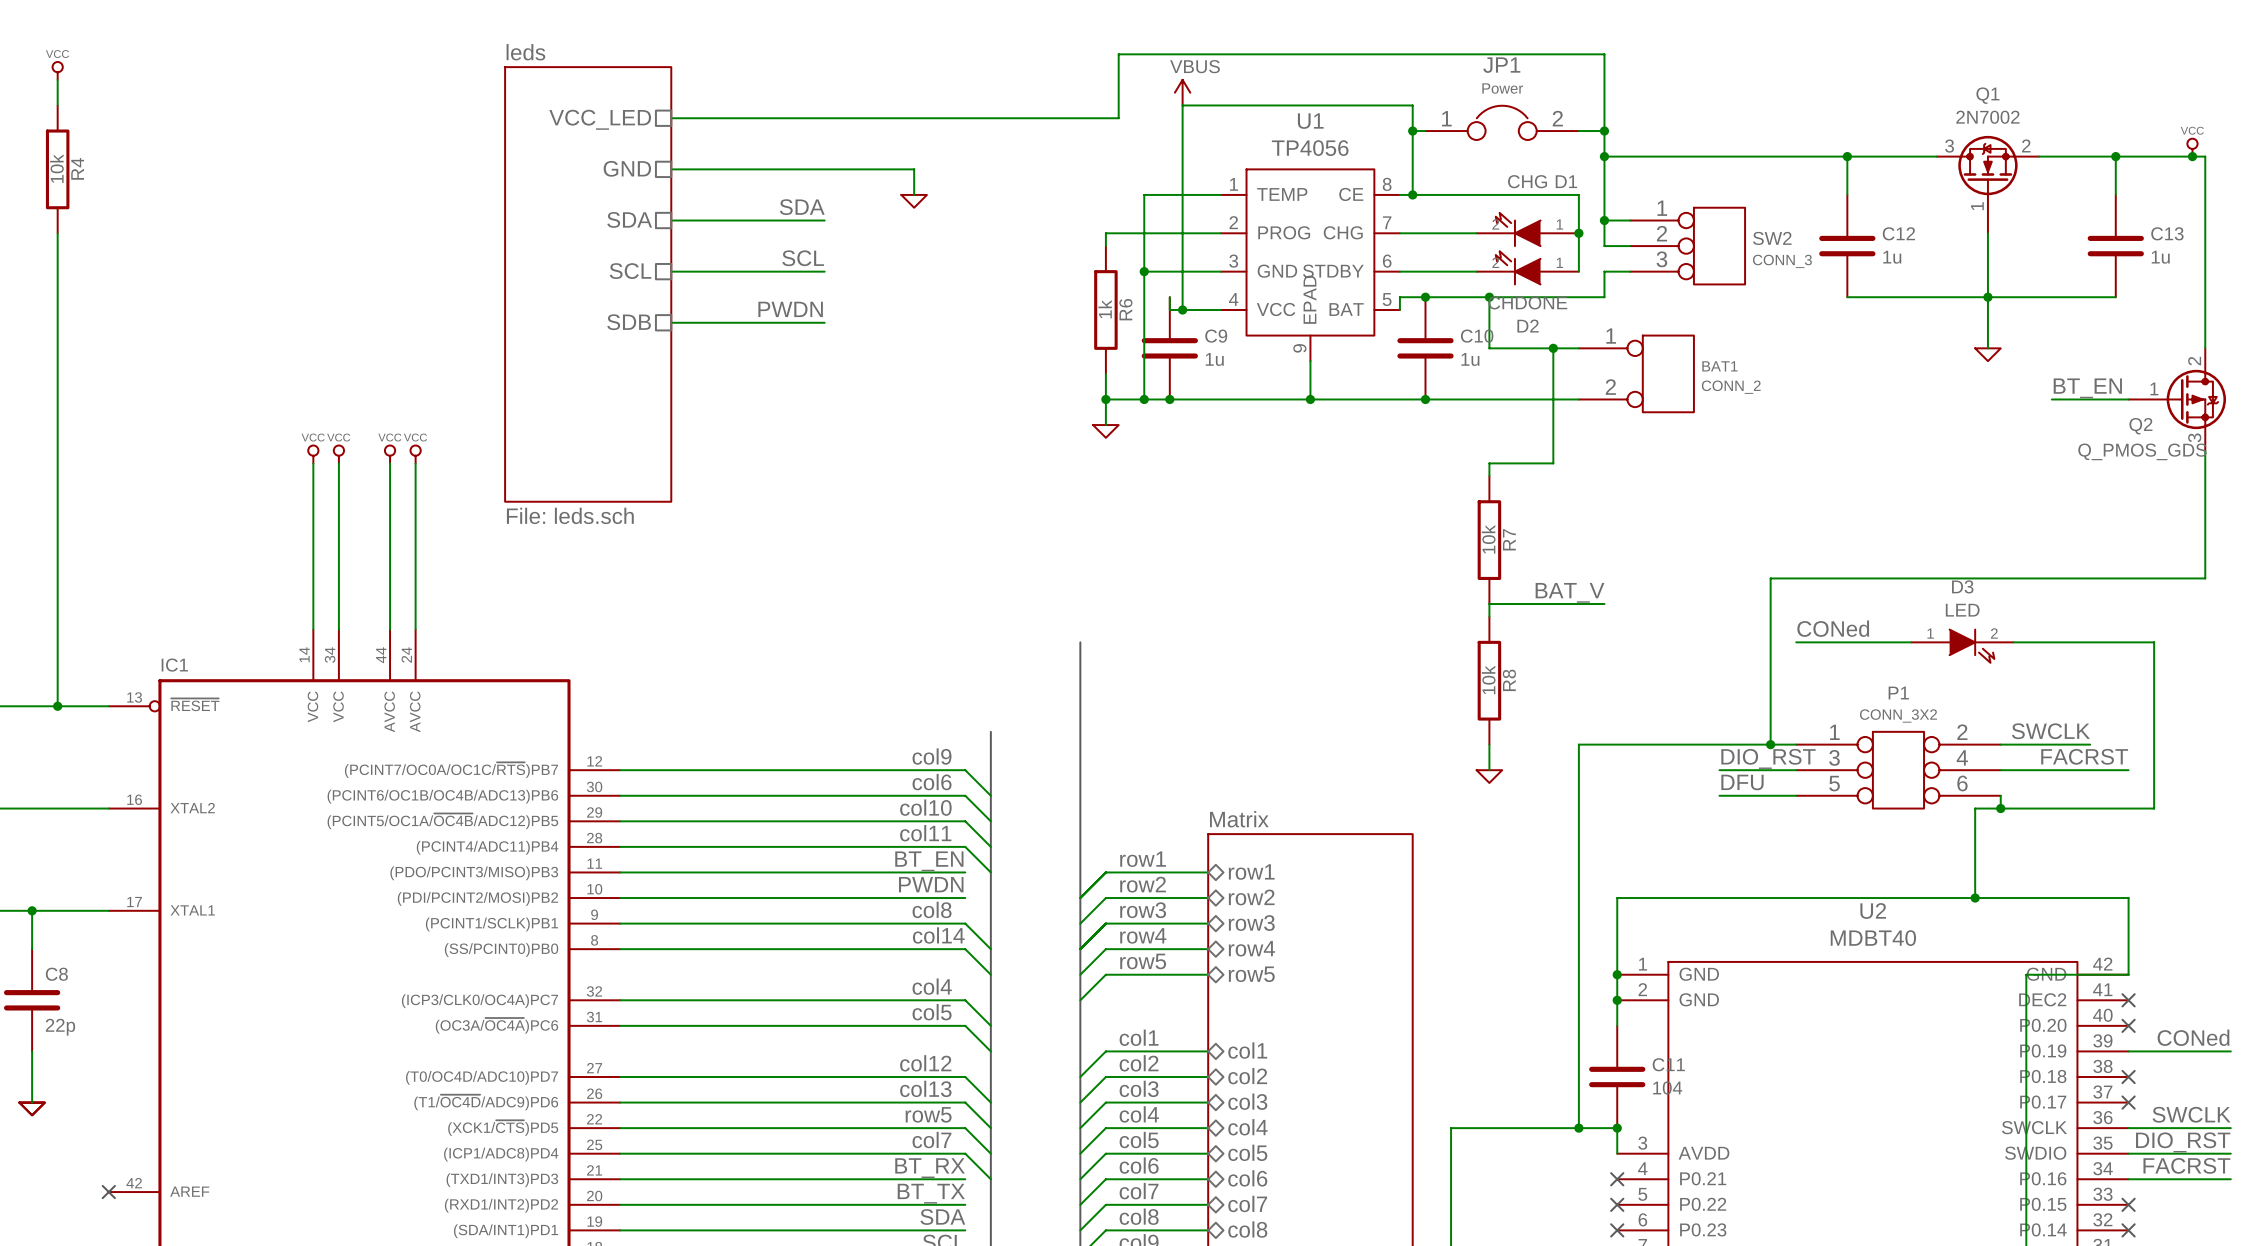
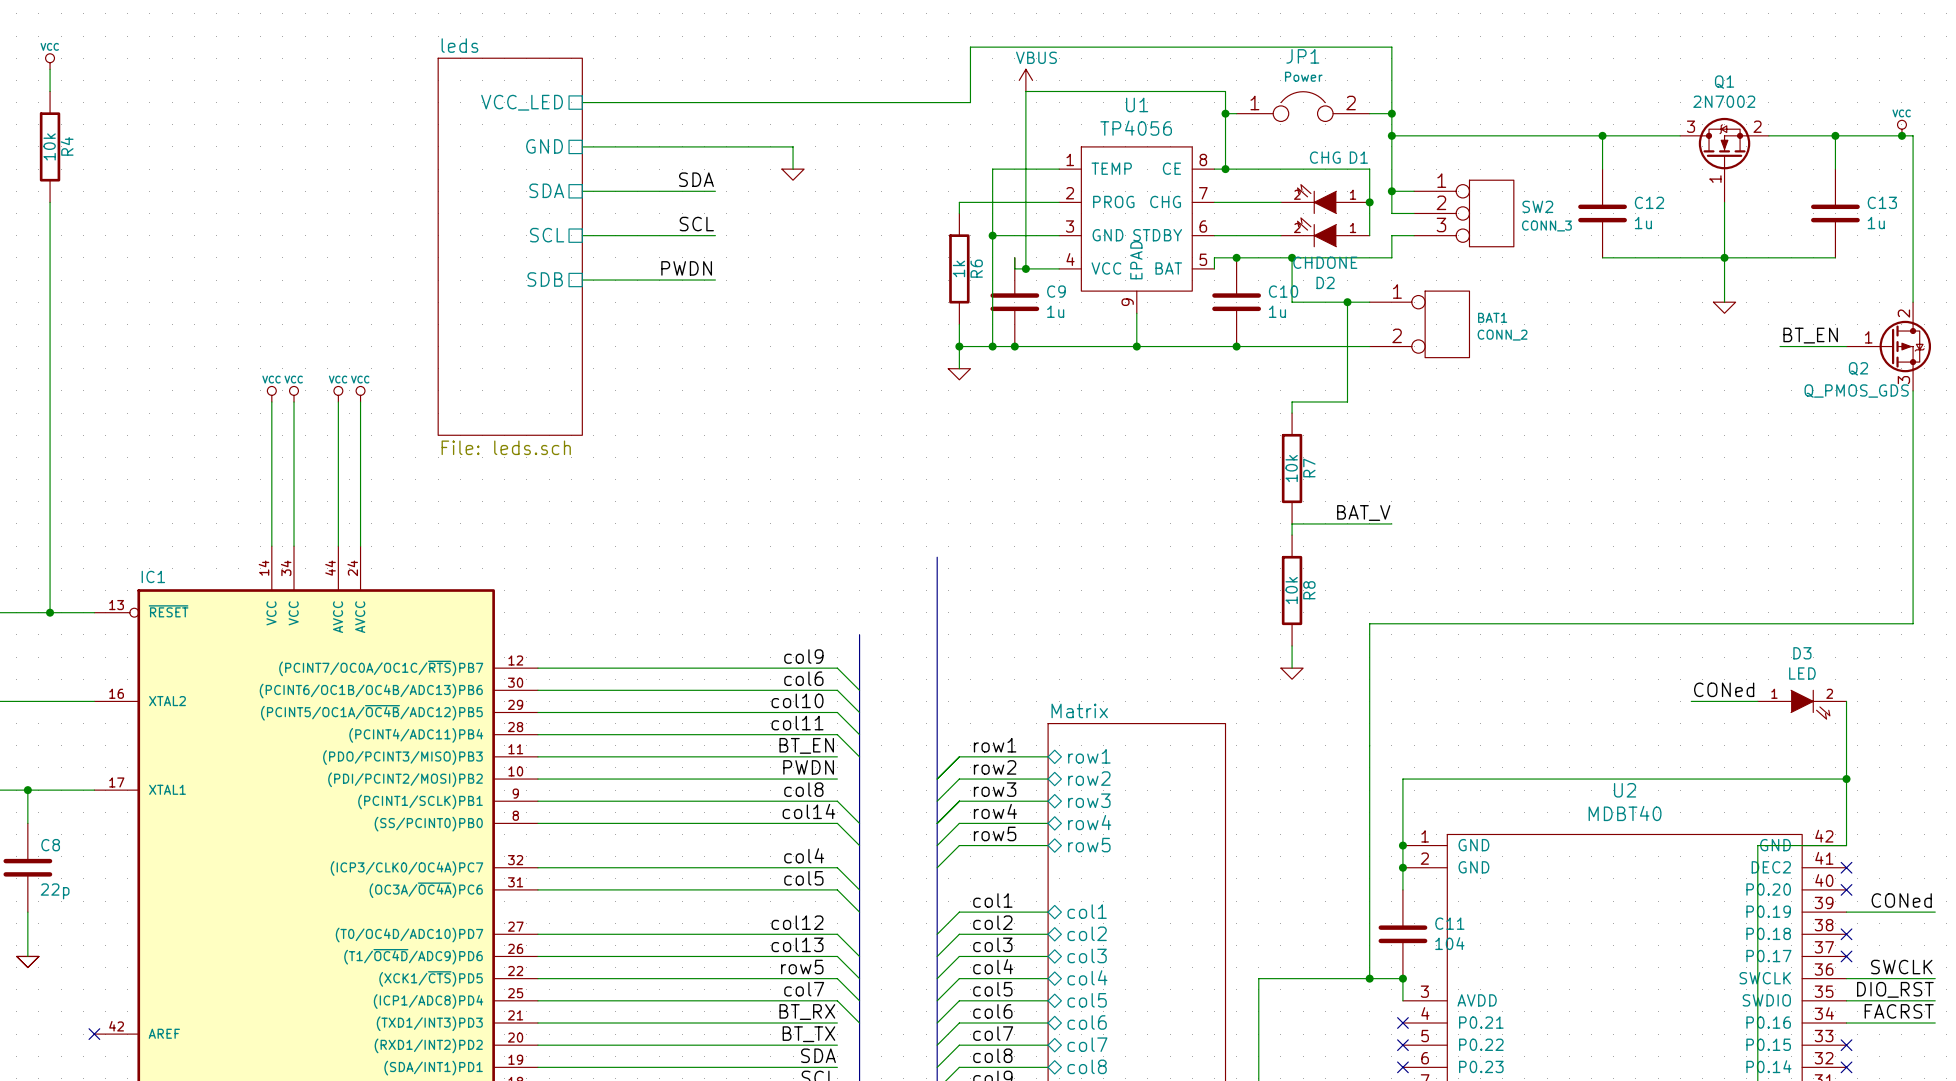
wire: (2205, 578) (1770, 578) (1770, 744) -> (1913, 501) (1913, 623) (1369, 623) (1369, 645)
label position: CONed (1833, 628) -> CONed (1724, 689)
wire: (1796, 642) (1911, 642) -> none
wire: (2013, 642) (2154, 642) (2154, 808) (2026, 808) -> none
D3 position: (1962, 646) -> (1802, 704)
label: SWCLK (2050, 731) -> none
wire: (1578, 744) (1796, 744) -> none
junction: (1770, 744) -> none
wire: (2000, 744) (2090, 744) -> none
label: FACRST (2084, 756) -> none
label: DIO_RST (1768, 758) -> none
wire: (1719, 770) (1796, 770) -> none
P1: CONN_3X2 (1898, 770) -> none
wire: (2000, 770) (2128, 770) -> none
label: DFU (1742, 782) -> none
wire: (1719, 795) (1796, 795) -> none
wire: (2000, 795) (2000, 808) -> none
wire: (1975, 808) (1975, 898) -> (1713, 701) (1691, 701)
junction: (2000, 808) -> none
wire: none -> (1846, 701) (1846, 779)
junction: (1975, 898) -> none
junction: none -> (1846, 779)

